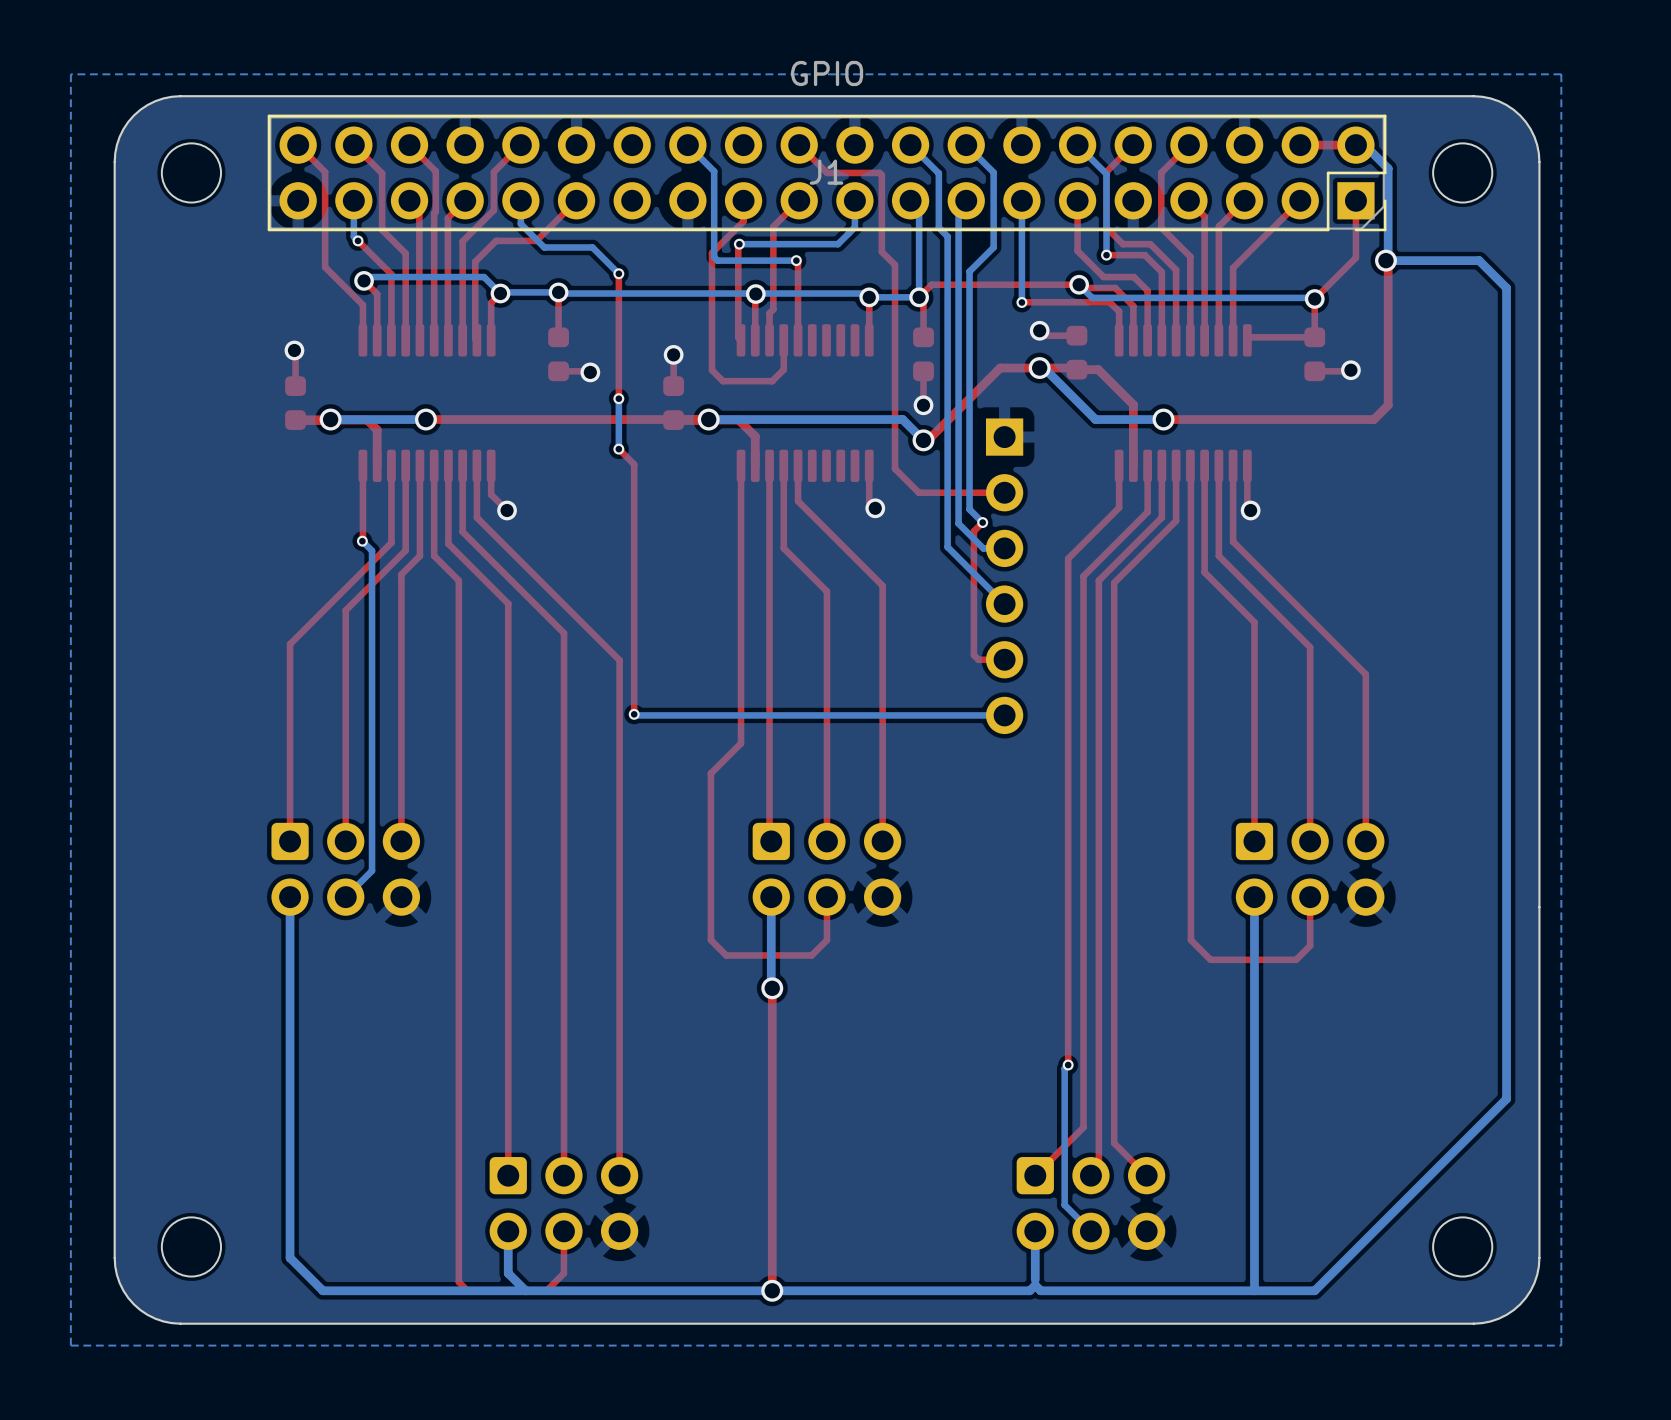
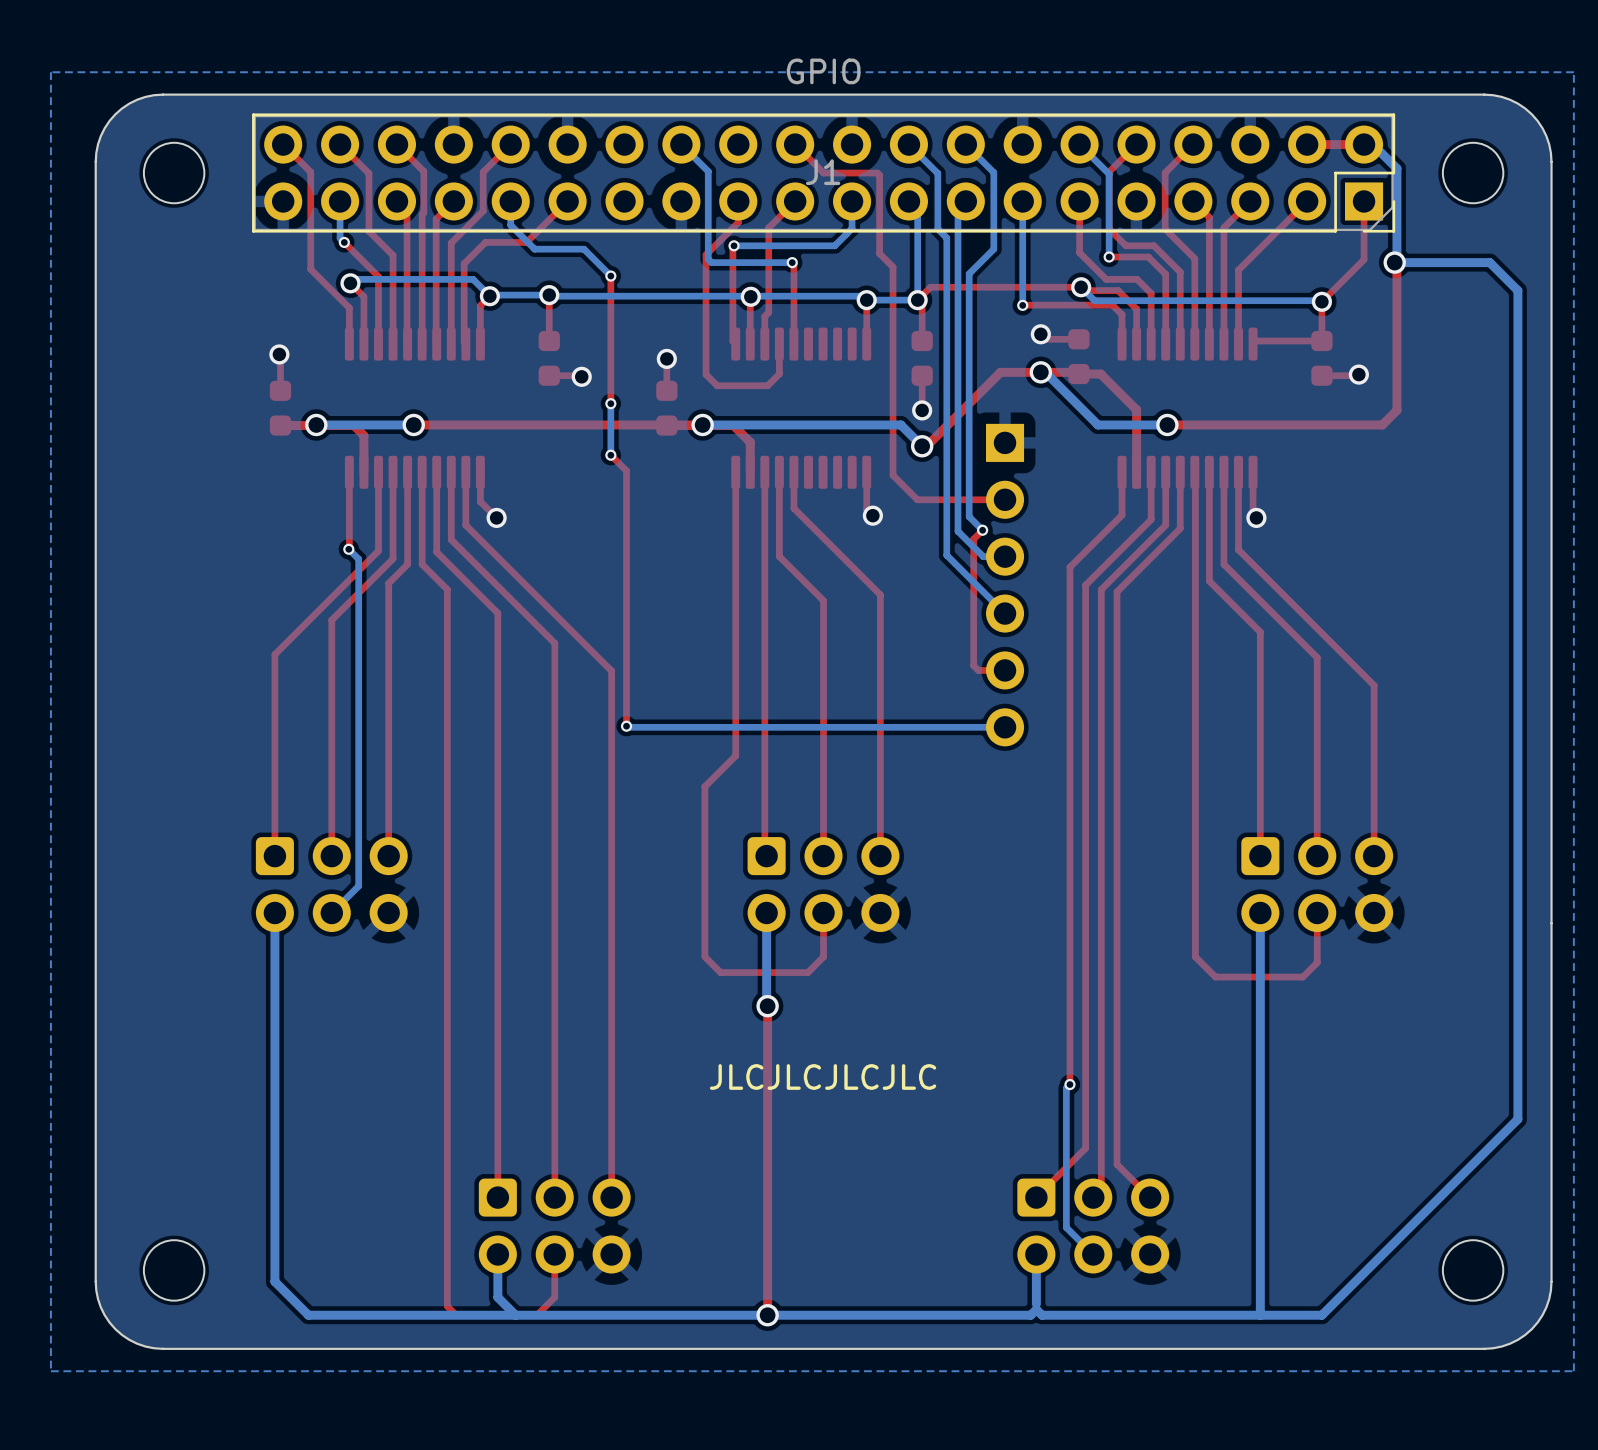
text: none -> JLCJLCJLCJLC (823, 1076)

